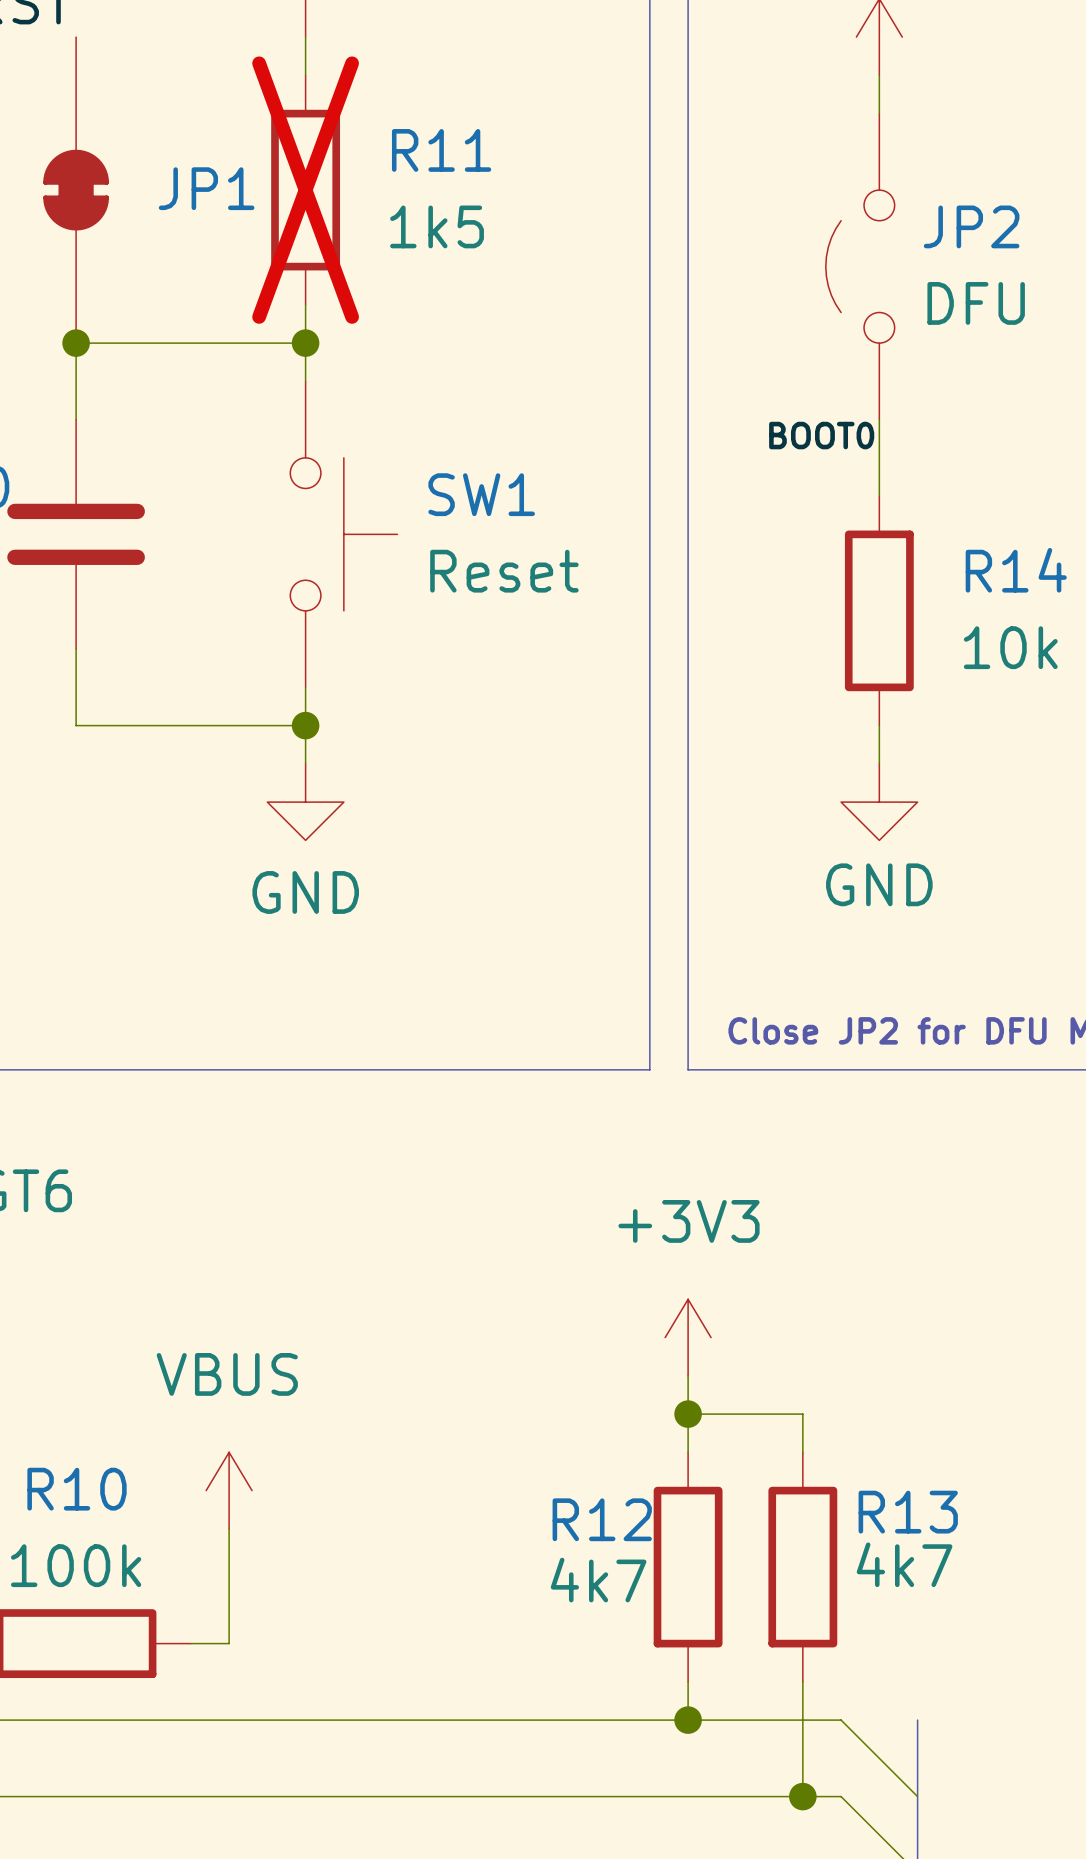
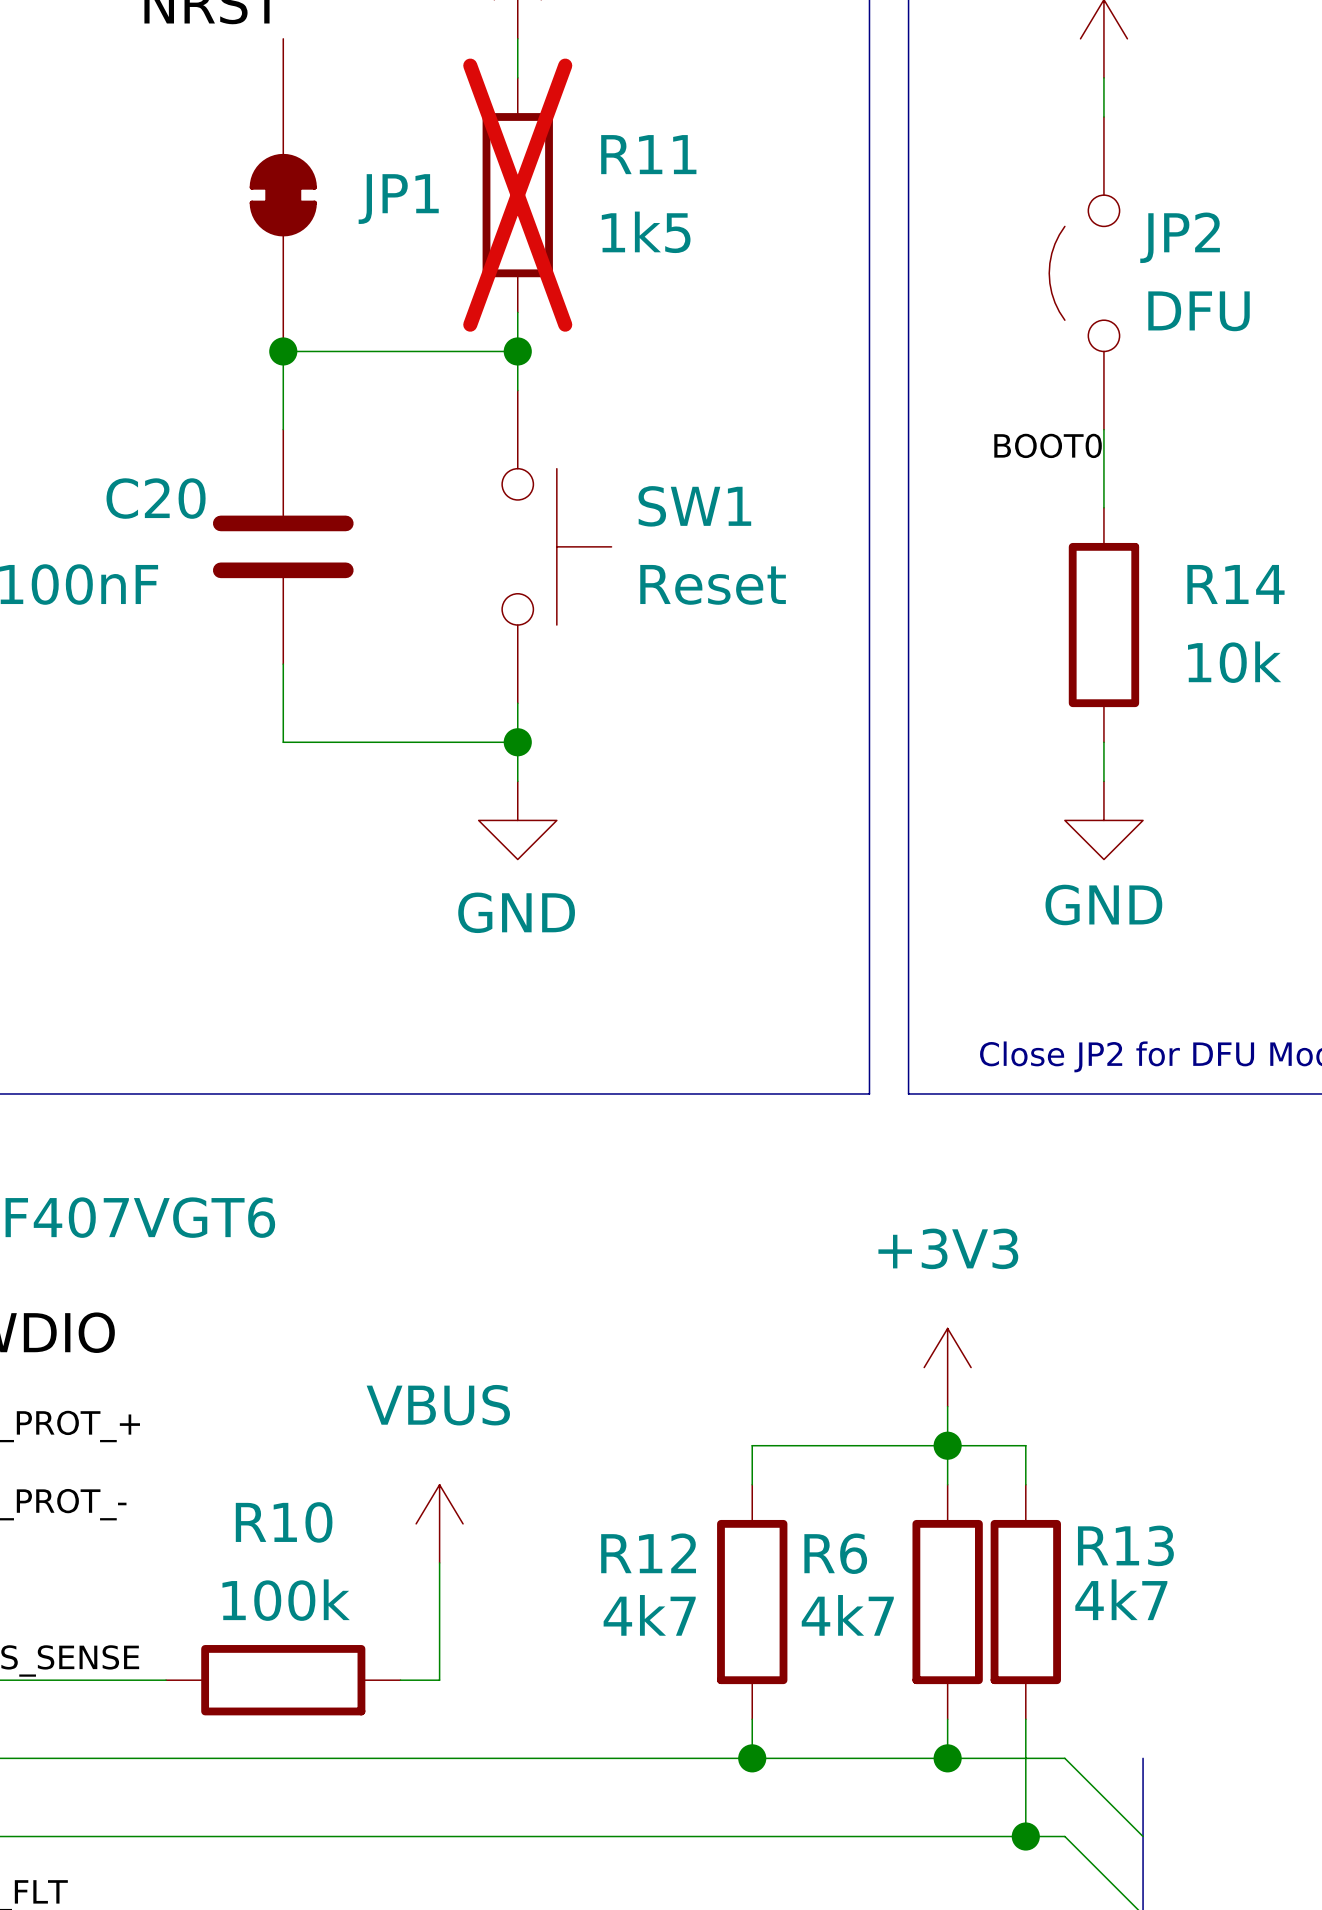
power symbol position: +3V3 (688, 1337) -> +3V3 (947, 1367)
wire: (688, 1375) (688, 1452) -> (947, 1406) (947, 1484)
wire: none -> (908, 1445) (752, 1445) (752, 1484)
junction position: (688, 1414) -> (947, 1445)
R12 name position: R12 (602, 1519) -> R12 (648, 1553)
R6: none -> 4k7 (752, 1602)
R12 position: (688, 1567) -> (947, 1602)
wire: none -> (752, 1719) (752, 1758)
wire: (688, 1681) (688, 1720) -> (947, 1719) (947, 1758)
junction: none -> (752, 1758)
junction position: (688, 1720) -> (947, 1758)

